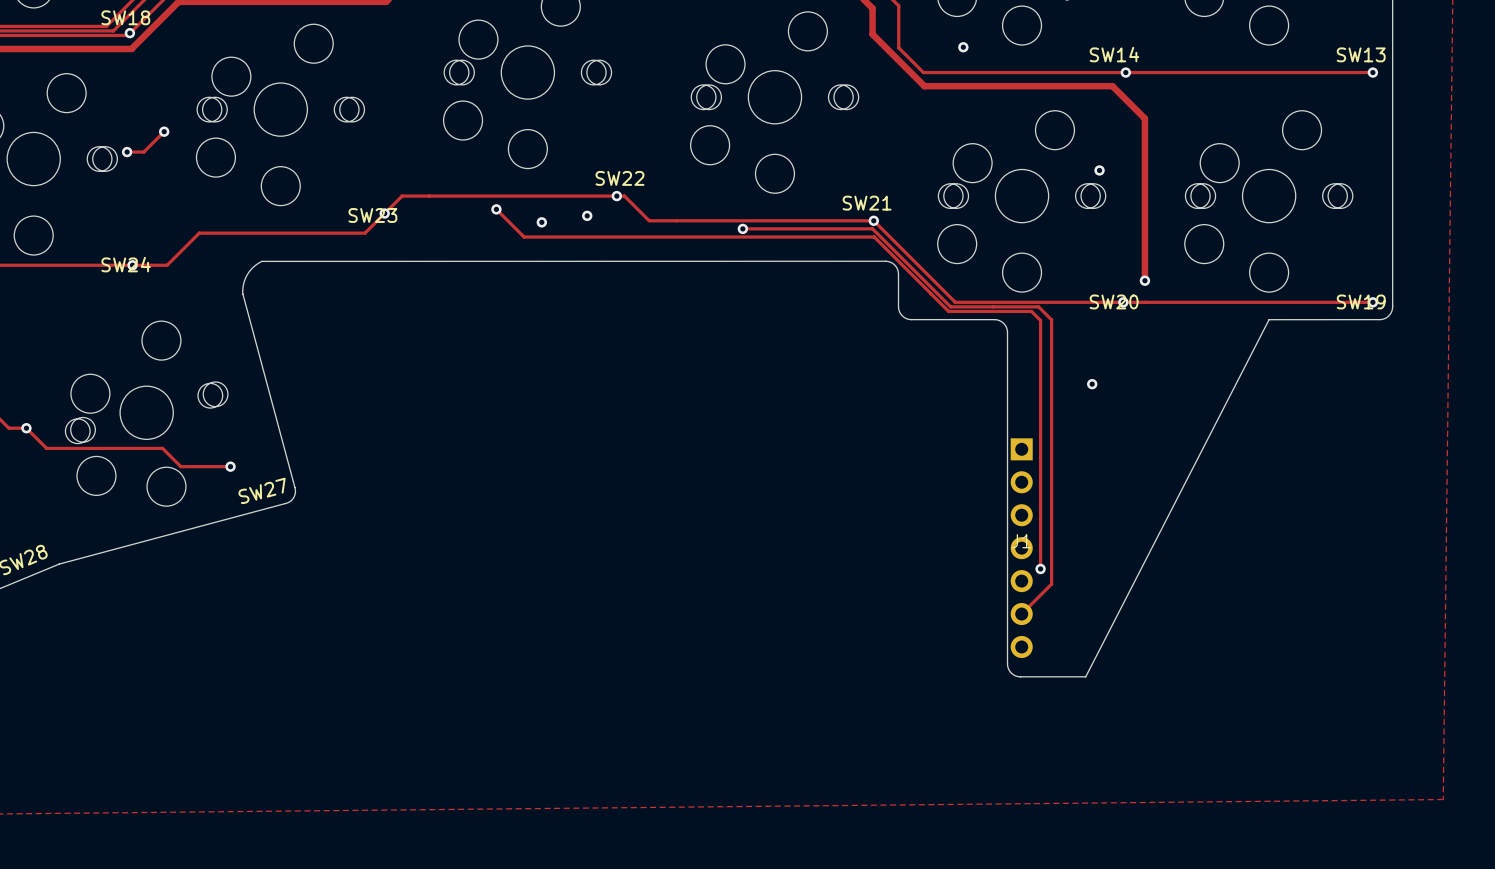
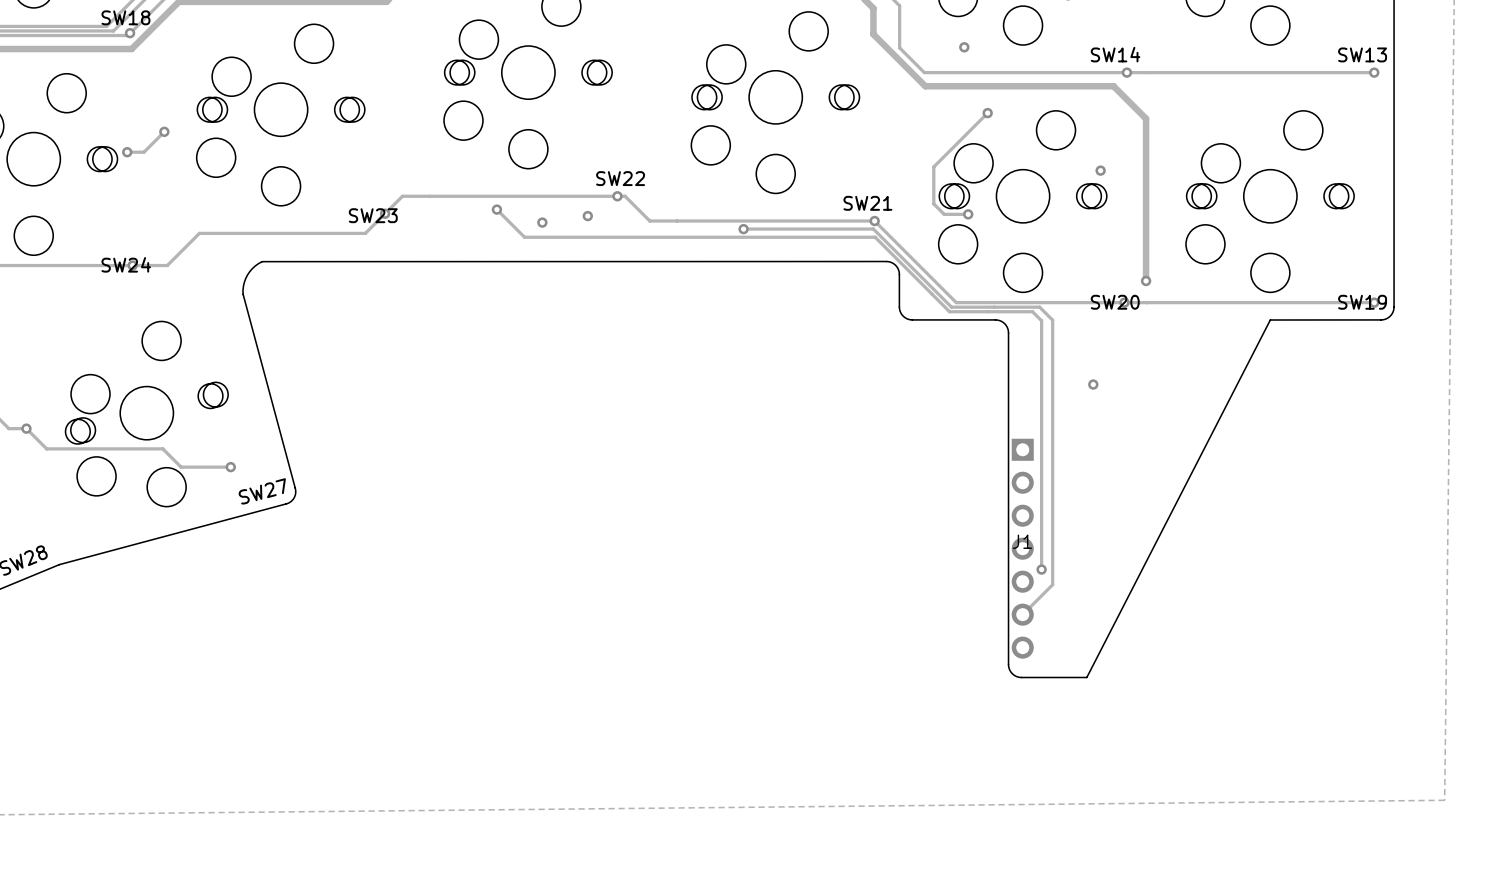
track: none -> (987, 113) (933, 166) (933, 203) (944, 214) (968, 214)
via: none -> (987, 113)
via: none -> (968, 214)

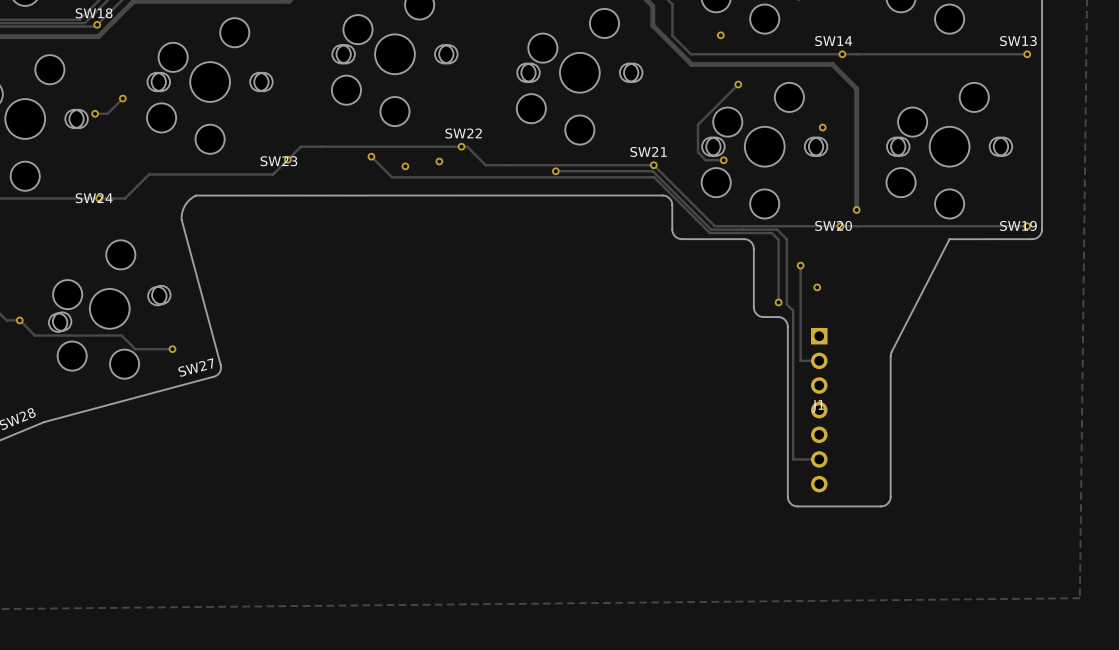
track: none -> (800, 265) (800, 360) (819, 360)
via: none -> (800, 265)
track: (1041, 404) (1041, 569) -> none
via: none -> (778, 302)
track: (1052, 407) (1052, 584) (1022, 614) -> (786, 304) (793, 310) (793, 459) (819, 459)
board edge: (1008, 411) (1008, 667) (1012, 673) (1018, 677) (1066, 677) -> (753, 307) (759, 316) (781, 317) (787, 324) (787, 496) (790, 503) (797, 506)
board edge: (1193, 470) (1086, 677) -> (891, 351) (889, 500) (882, 506) (812, 506)
J1 position: (1022, 548) -> (819, 410)
via: (1041, 569) -> none

